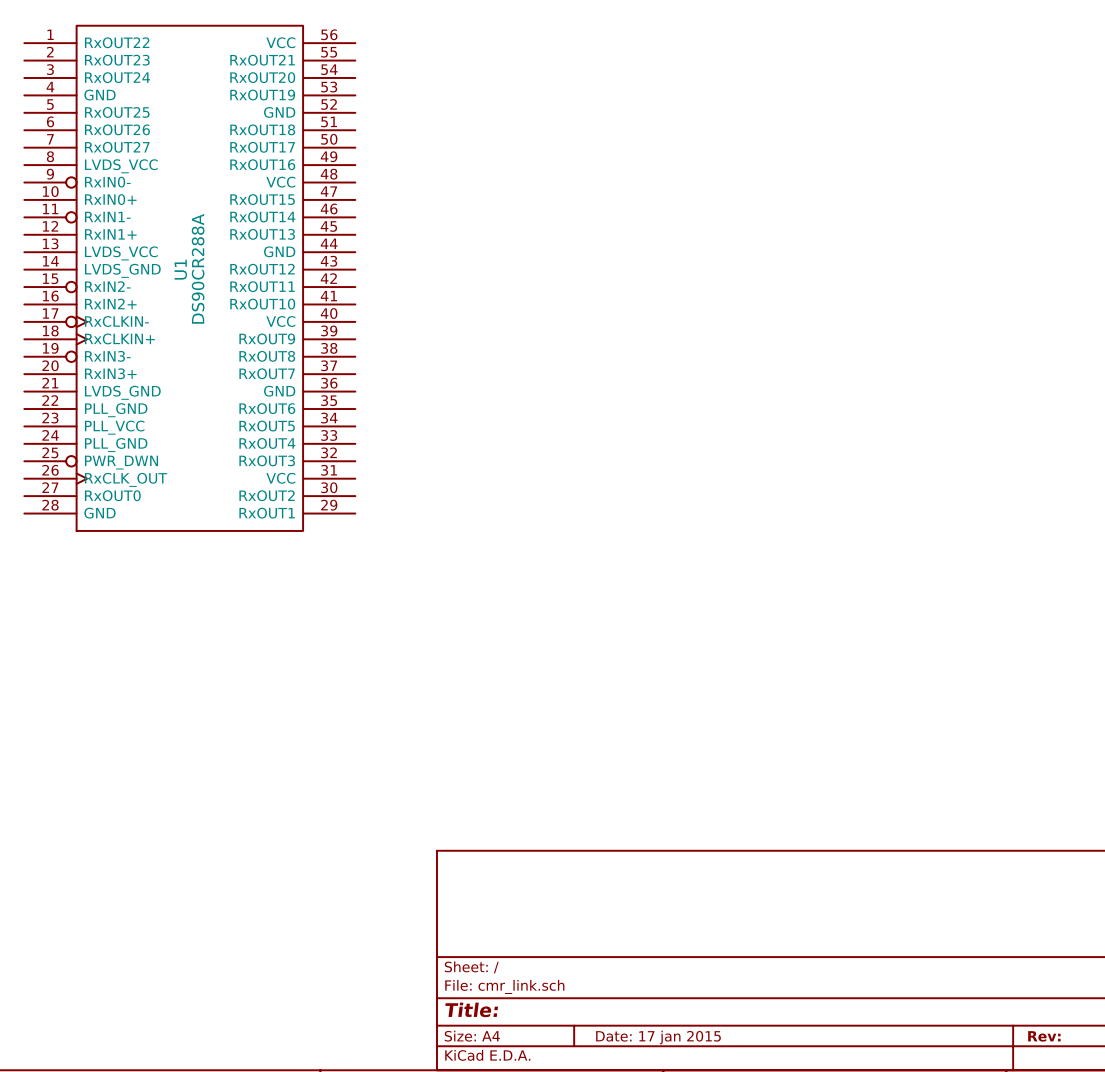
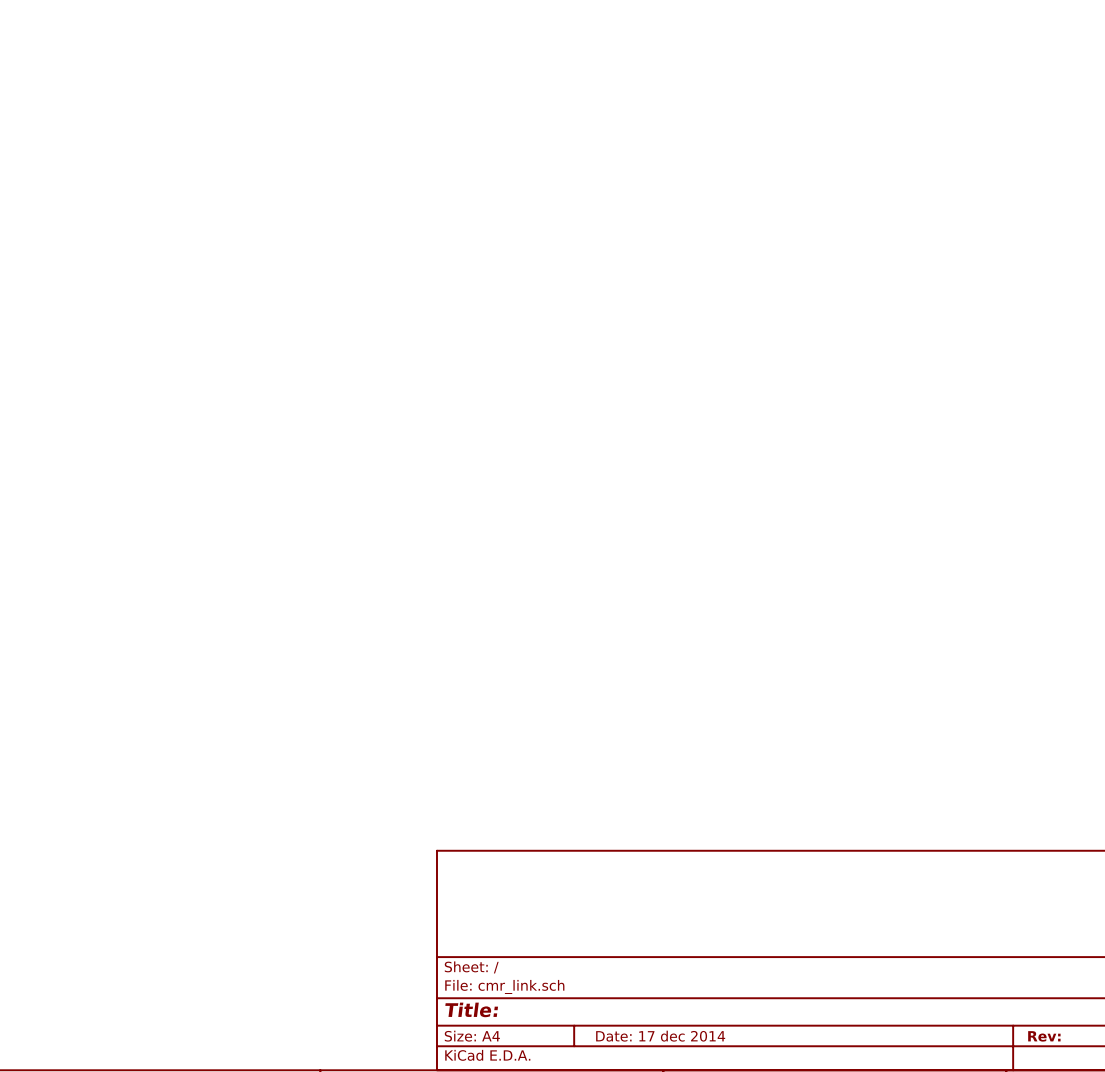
U1: DS90CR288A (189, 278) -> none
title block: Date: 17 jan 2015 (658, 1037) -> Date: 17 dec 2014 (660, 1036)

